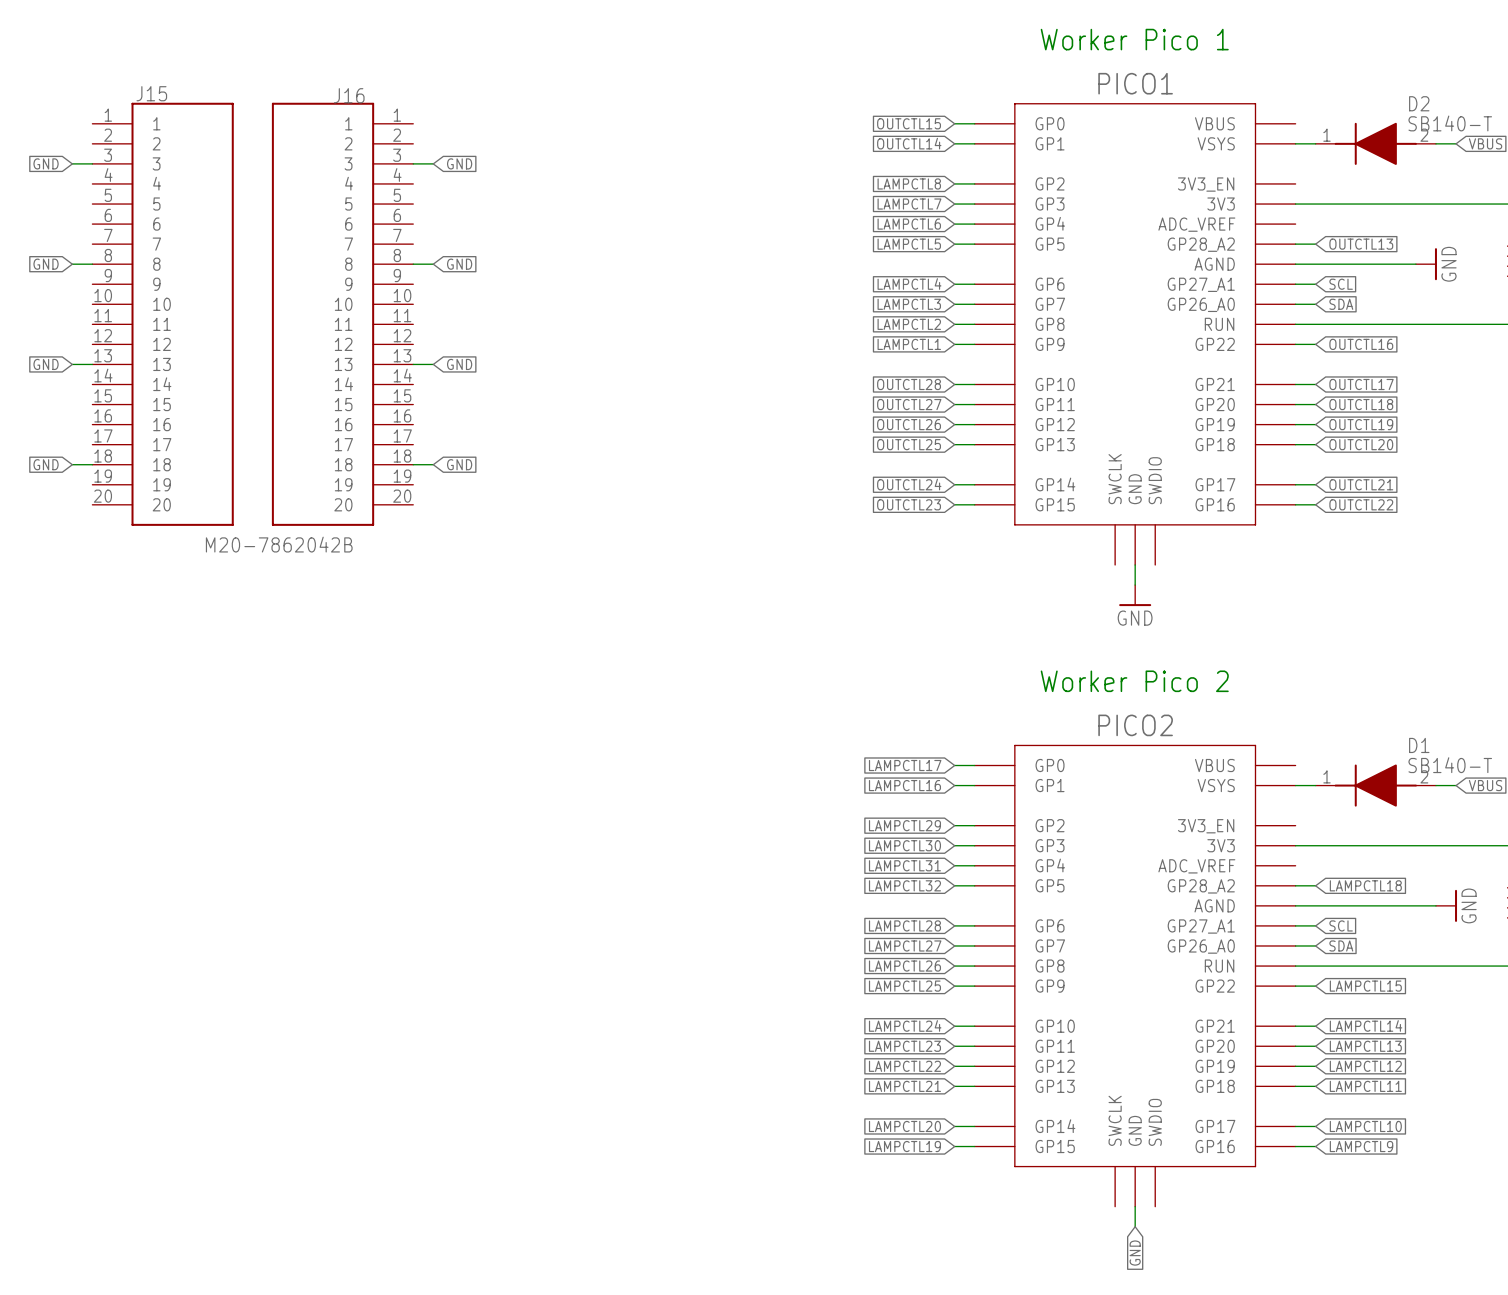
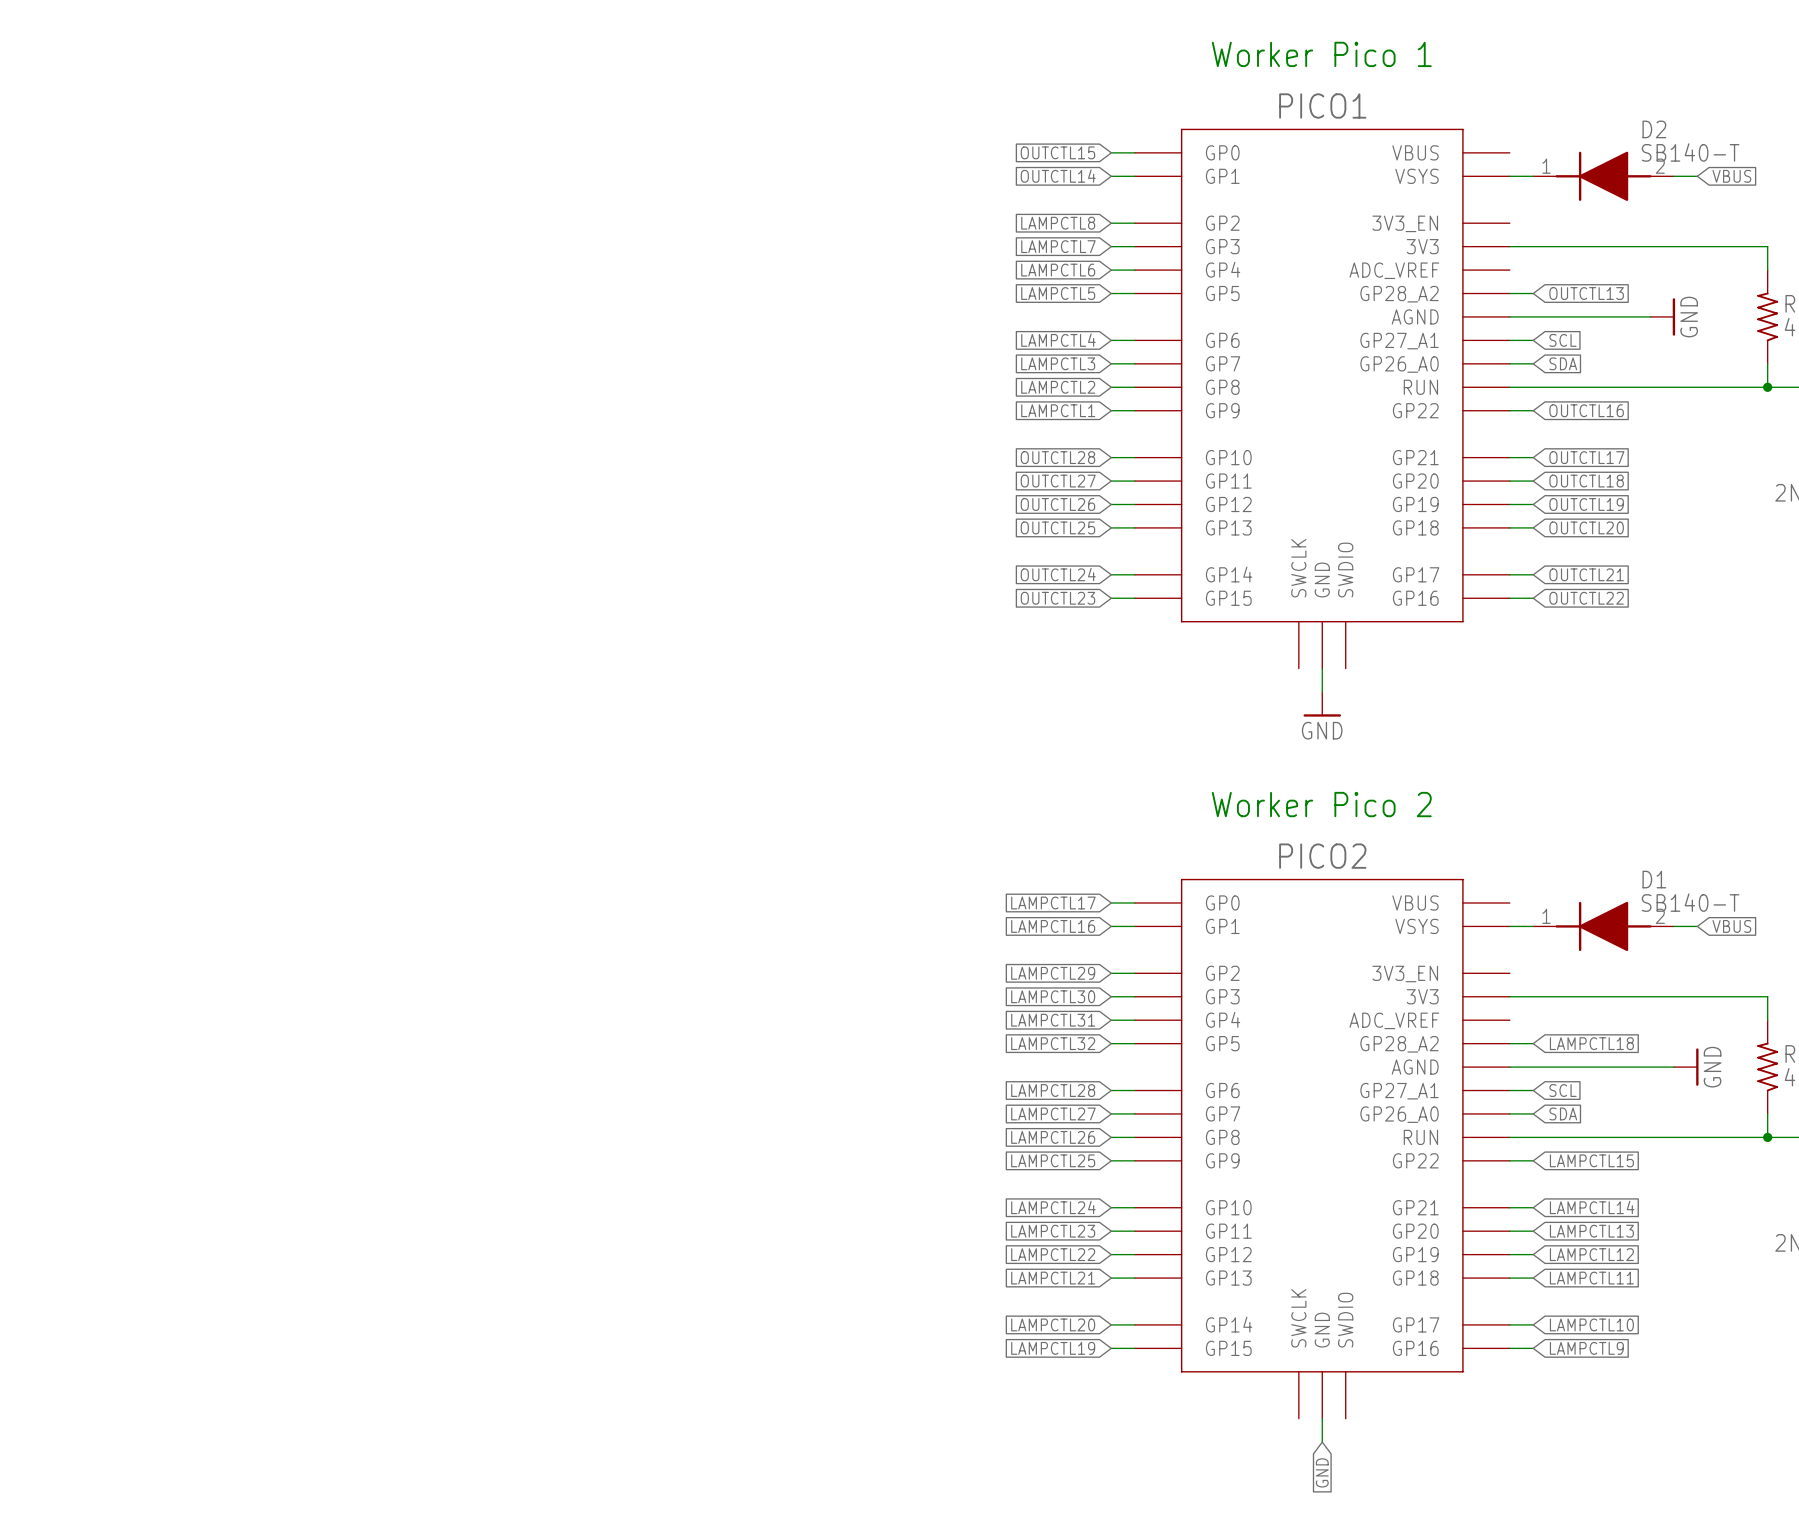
global label: GND (46, 163) -> none
wire: (72, 163) (92, 163) -> none
wire: (413, 163) (433, 163) -> none
global label: GND (459, 163) -> none
global label: GND (46, 264) -> none
wire: (72, 264) (92, 264) -> none
wire: (413, 264) (433, 264) -> none
global label: GND (459, 264) -> none
J15: M20-7862042B (163, 314) -> none
J16: (342, 314) -> none
global label: GND (46, 364) -> none
wire: (72, 364) (92, 364) -> none
wire: (413, 364) (433, 364) -> none
global label: GND (459, 364) -> none
global label: GND (46, 464) -> none
wire: (72, 464) (92, 464) -> none
wire: (413, 464) (433, 464) -> none
global label: GND (459, 464) -> none

